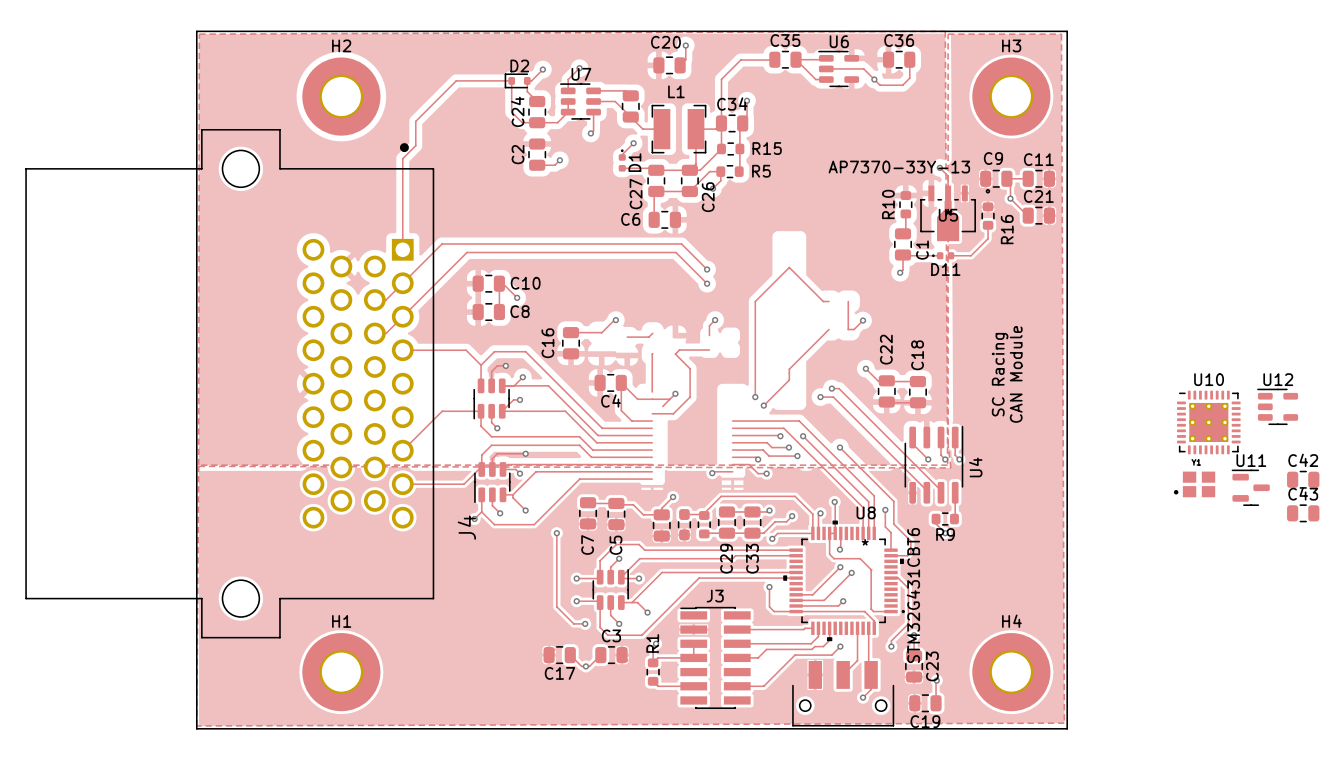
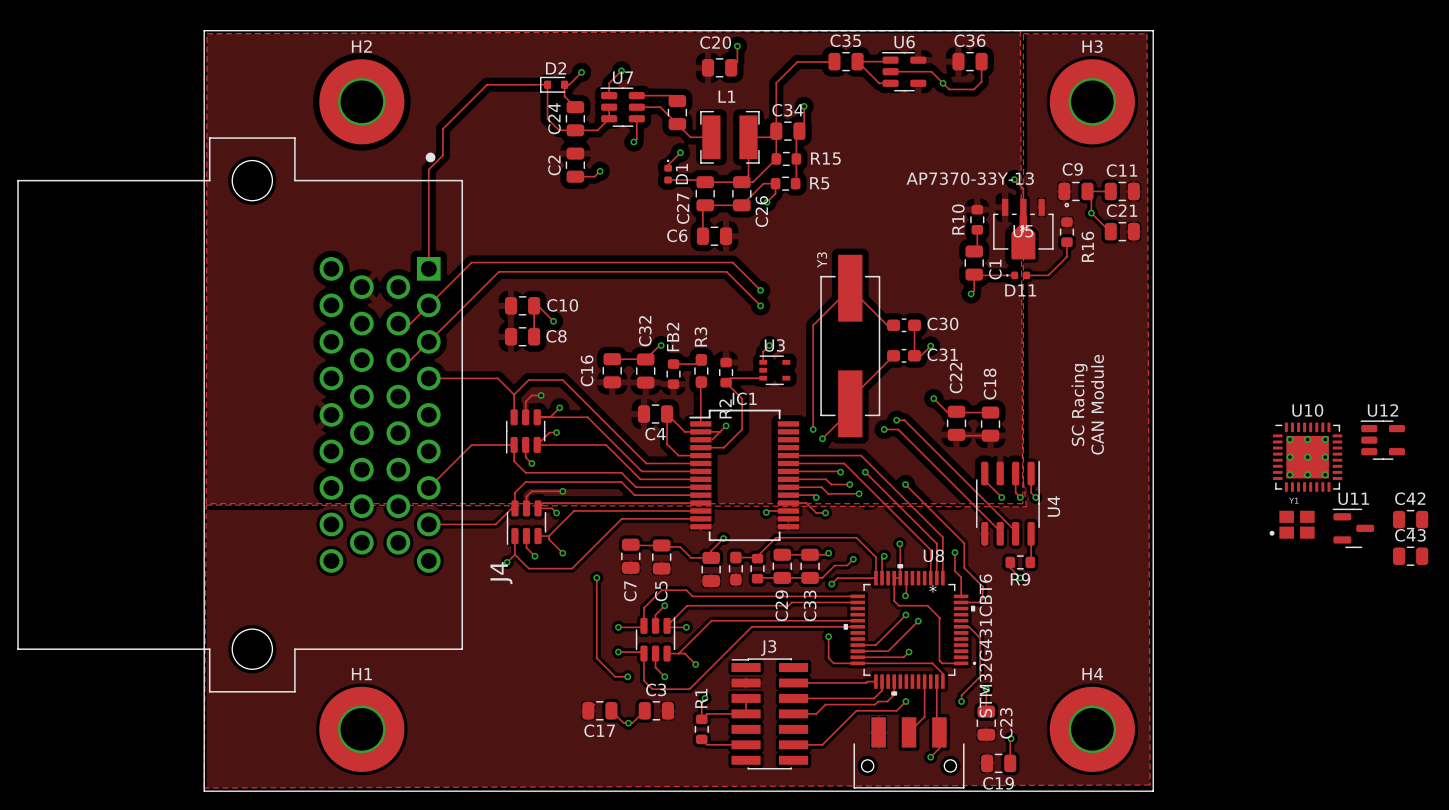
C30: none -> (904, 325)
Y3: none -> (850, 346)
C31: none -> (904, 355)
U3: none -> (774, 370)
C32: none -> (645, 371)
R3: none -> (701, 371)
R2: none -> (726, 372)
FB2: none -> (673, 374)
IC1: none -> (744, 475)

